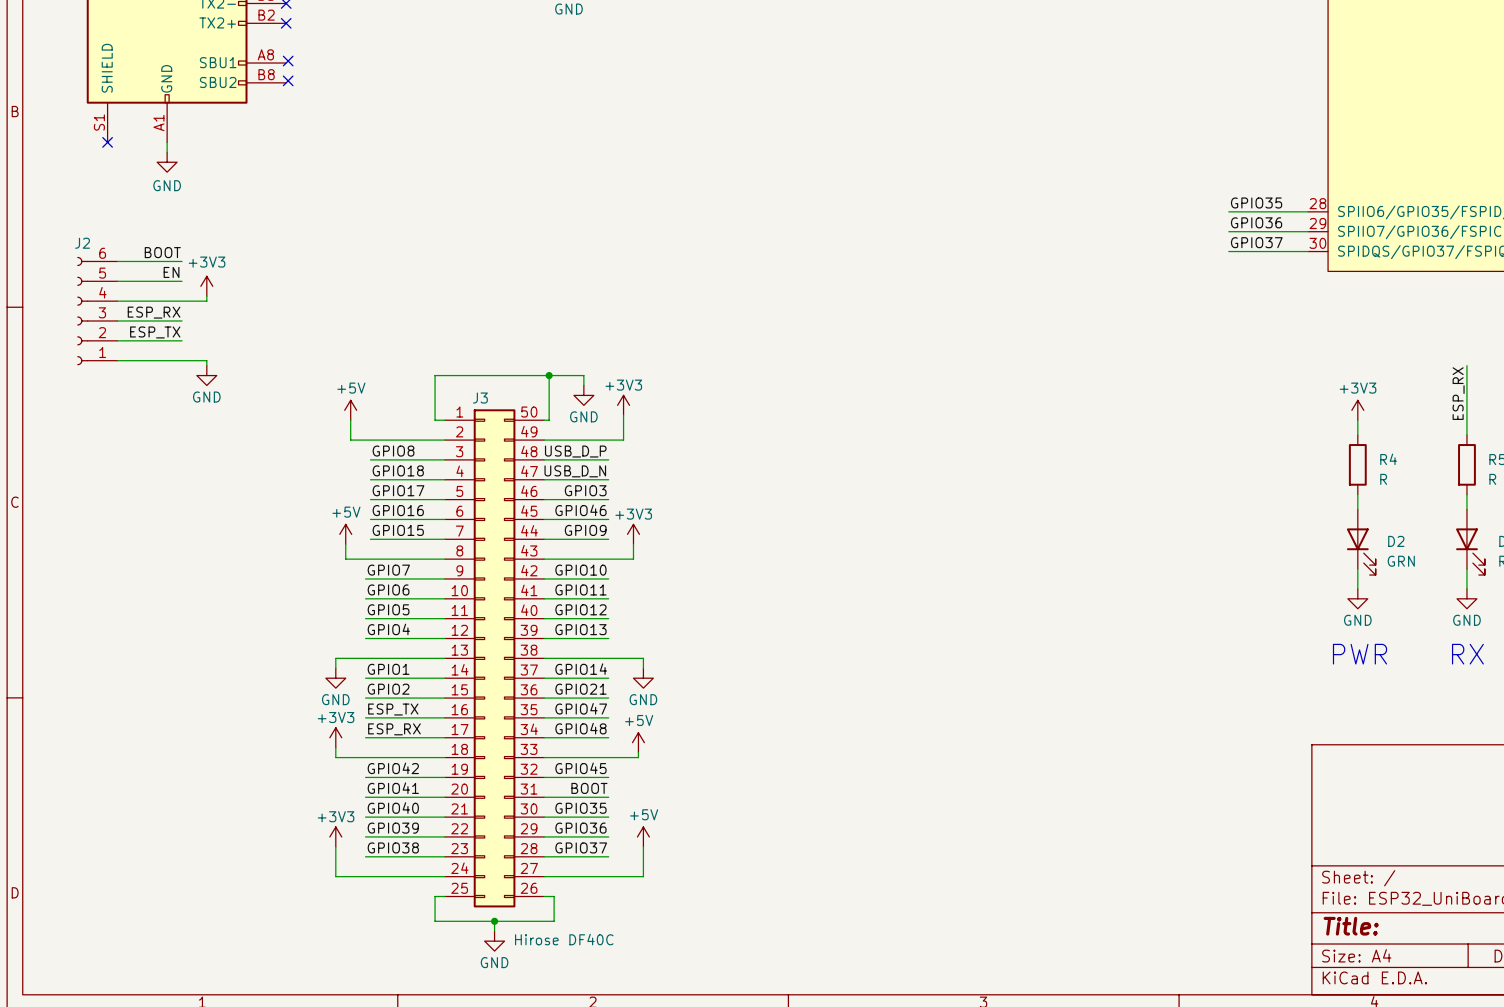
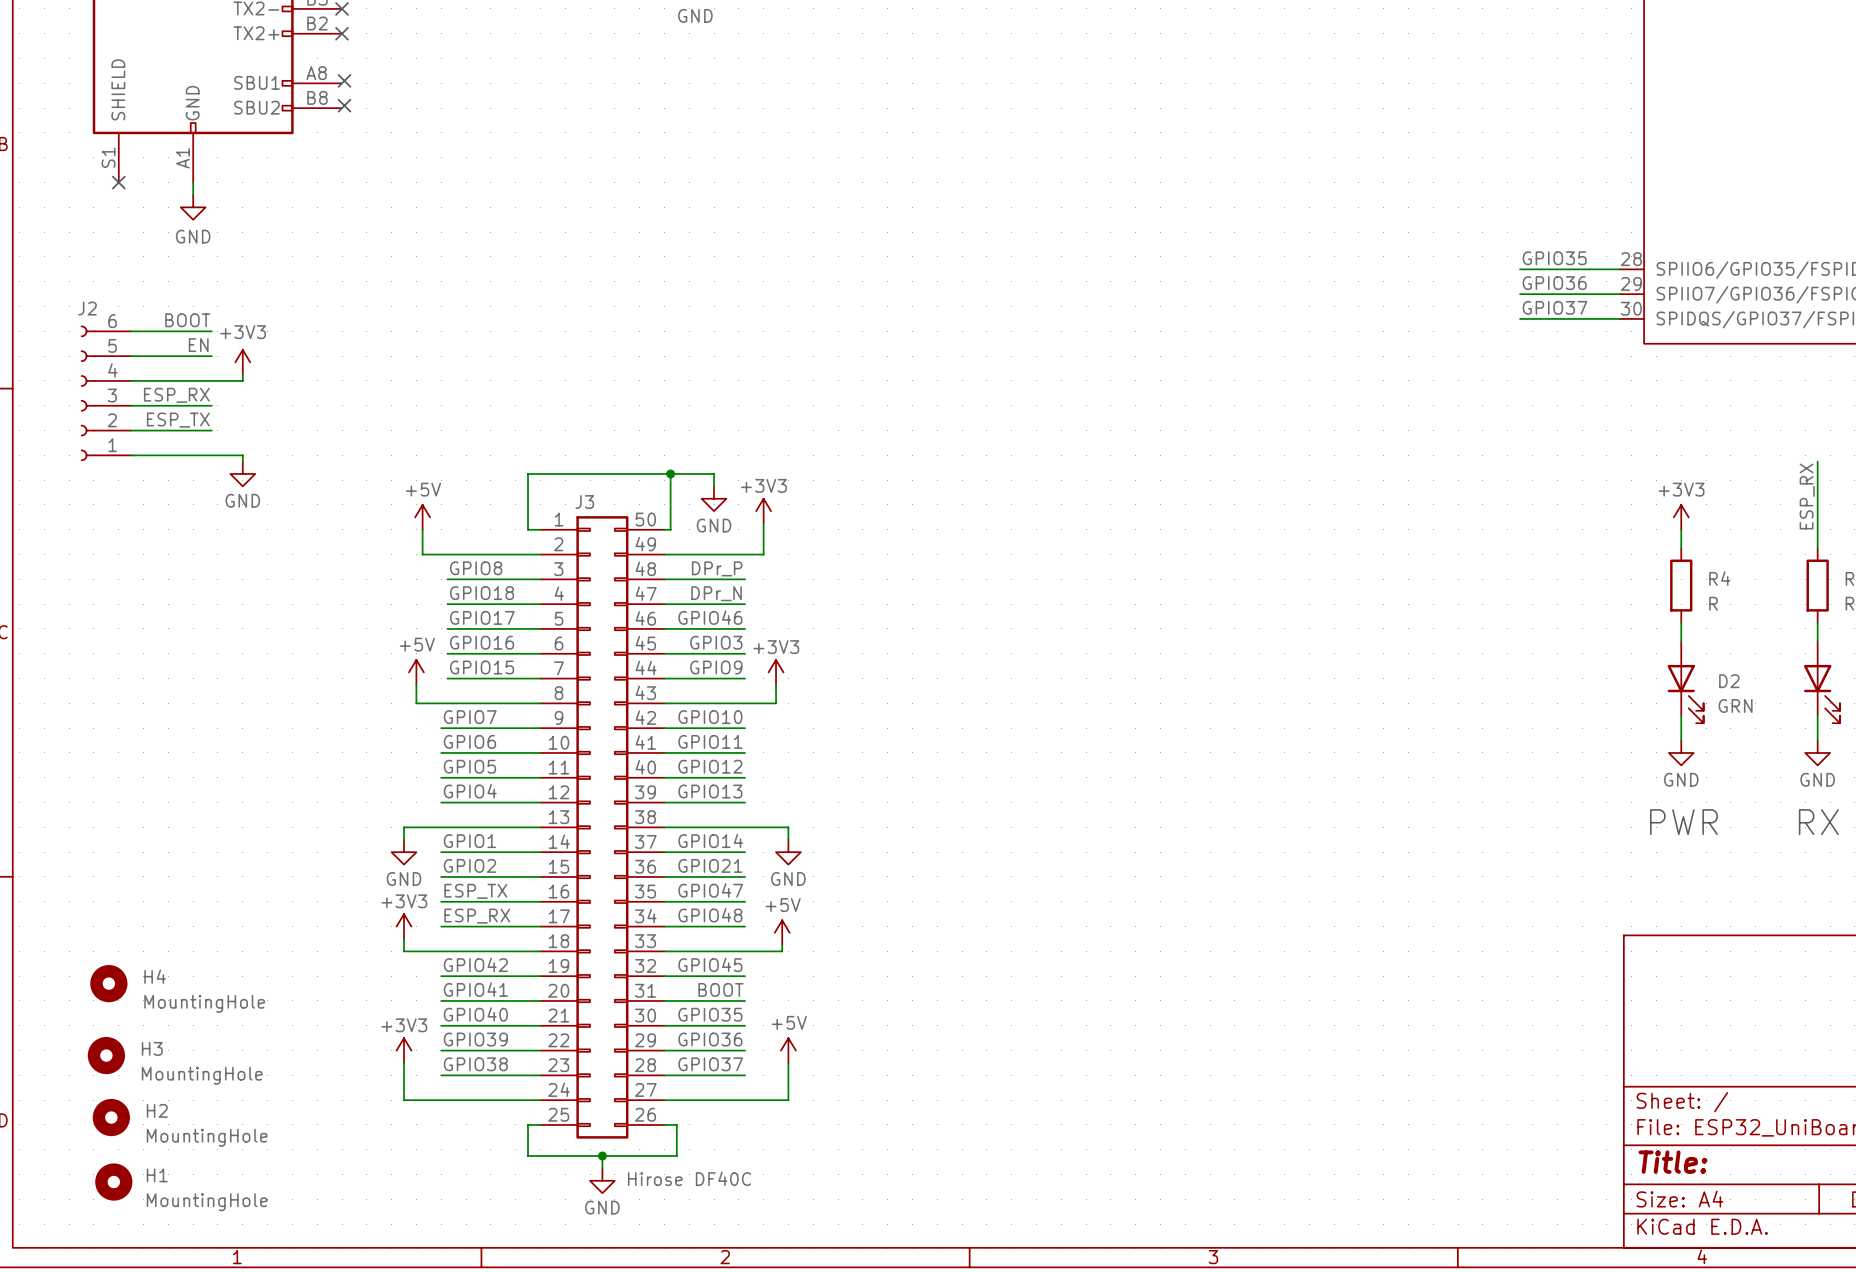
label: USB_D_P (575, 451) -> DPr_P (717, 568)
label: USB_D_N (575, 471) -> DPr_N (716, 593)
label: GPIO3 (585, 490) -> GPIO46 (710, 617)
label: GPIO46 (580, 510) -> GPIO3 (716, 642)
H4: none -> MountingHole (108, 983)
H3: none -> MountingHole (106, 1055)
H2: none -> MountingHole (111, 1117)
H1: none -> MountingHole (113, 1182)

